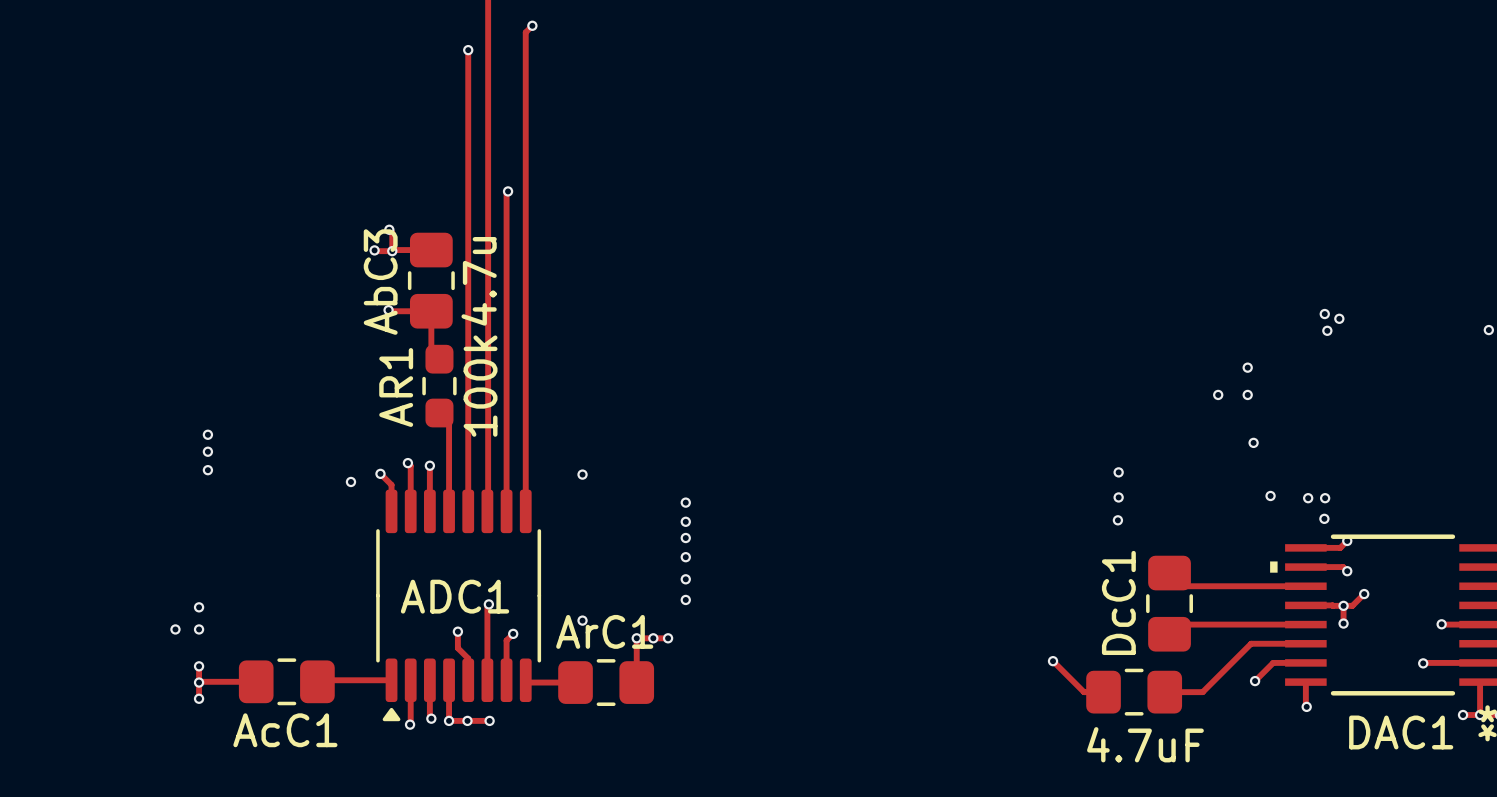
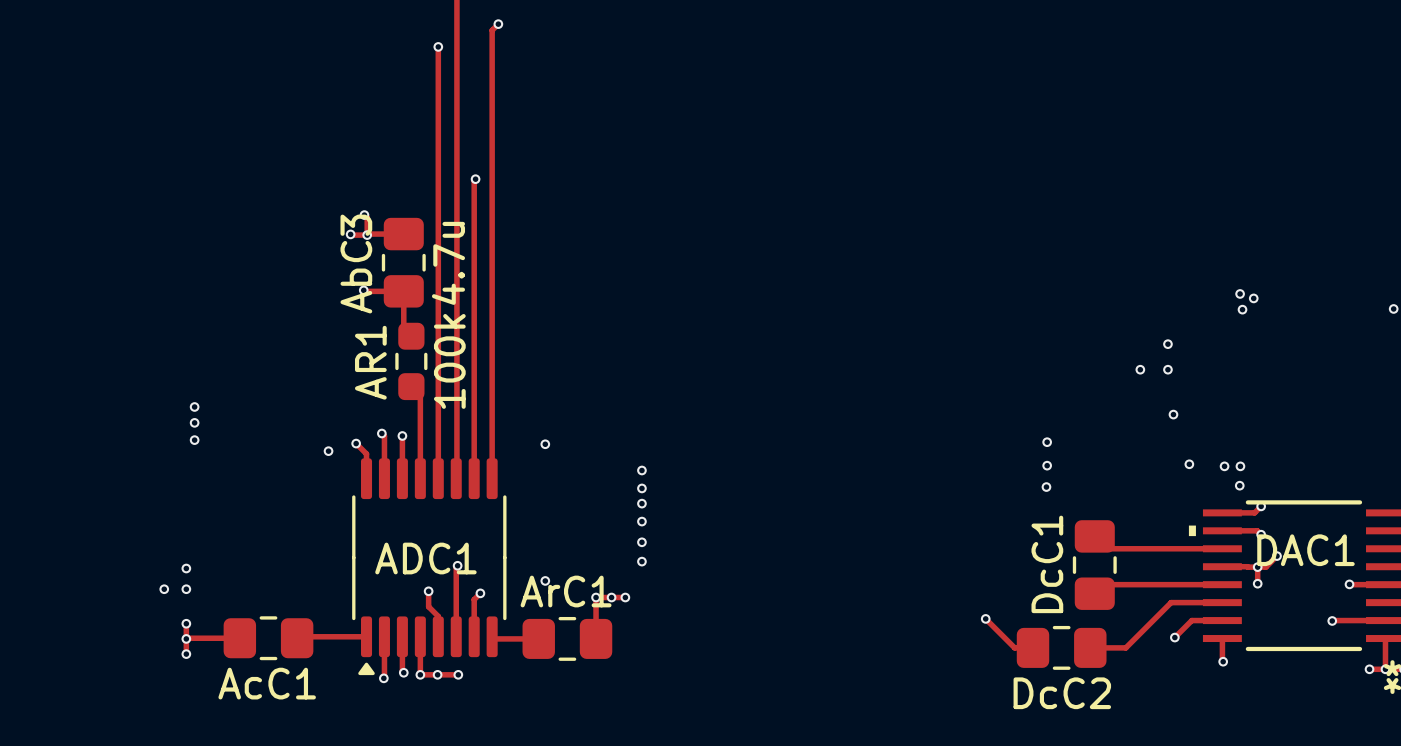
DAC1 name position: DAC1 (1401, 732) -> DAC1 (1305, 550)
DcC2 name: none -> DcC2 (1062, 693)
DcC2 value: 4.7uF (1145, 744) -> none

